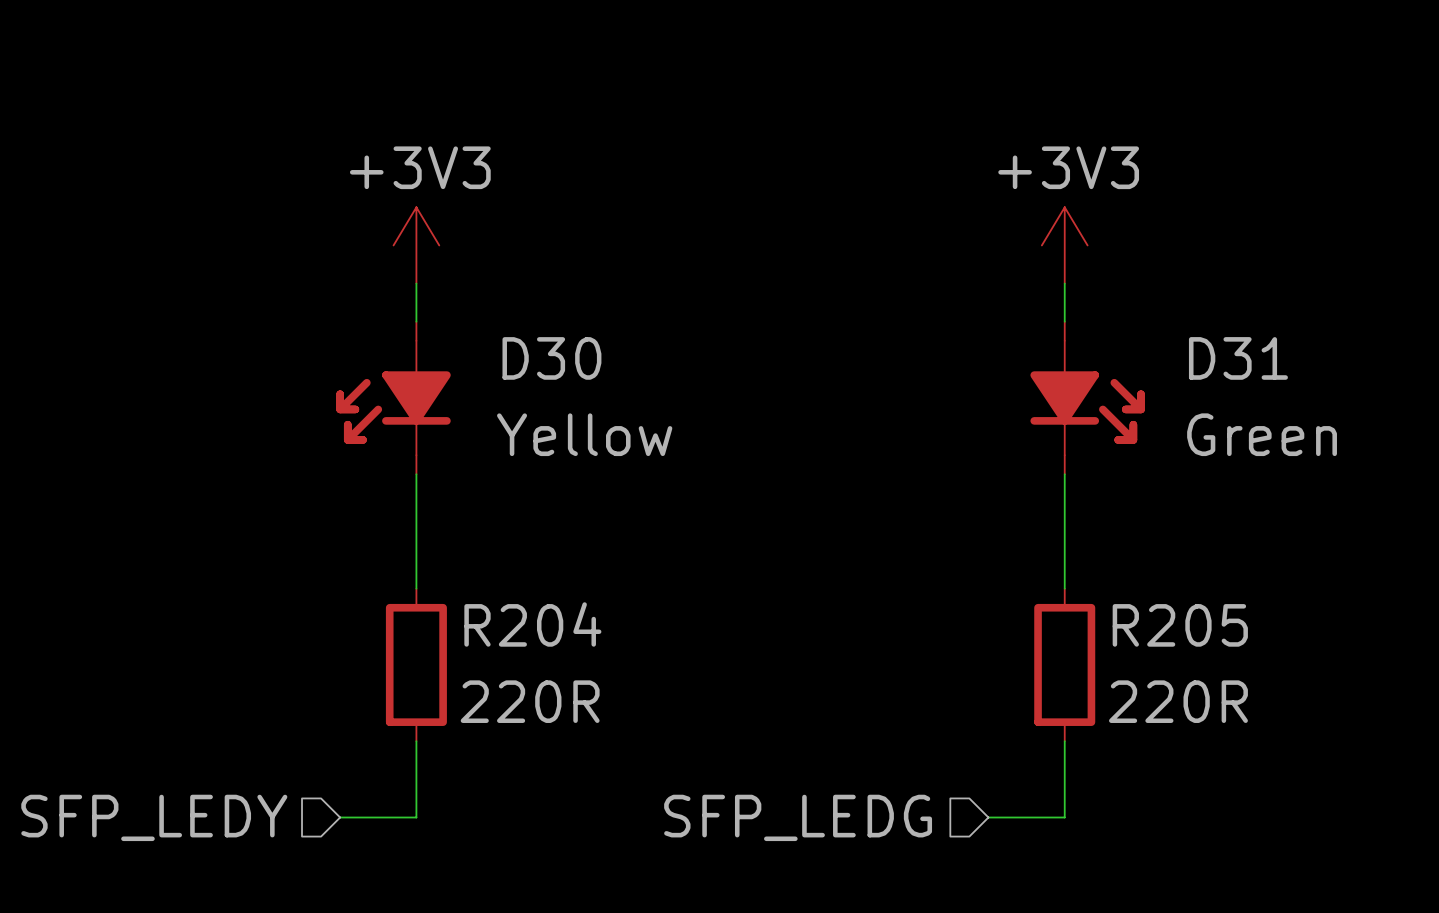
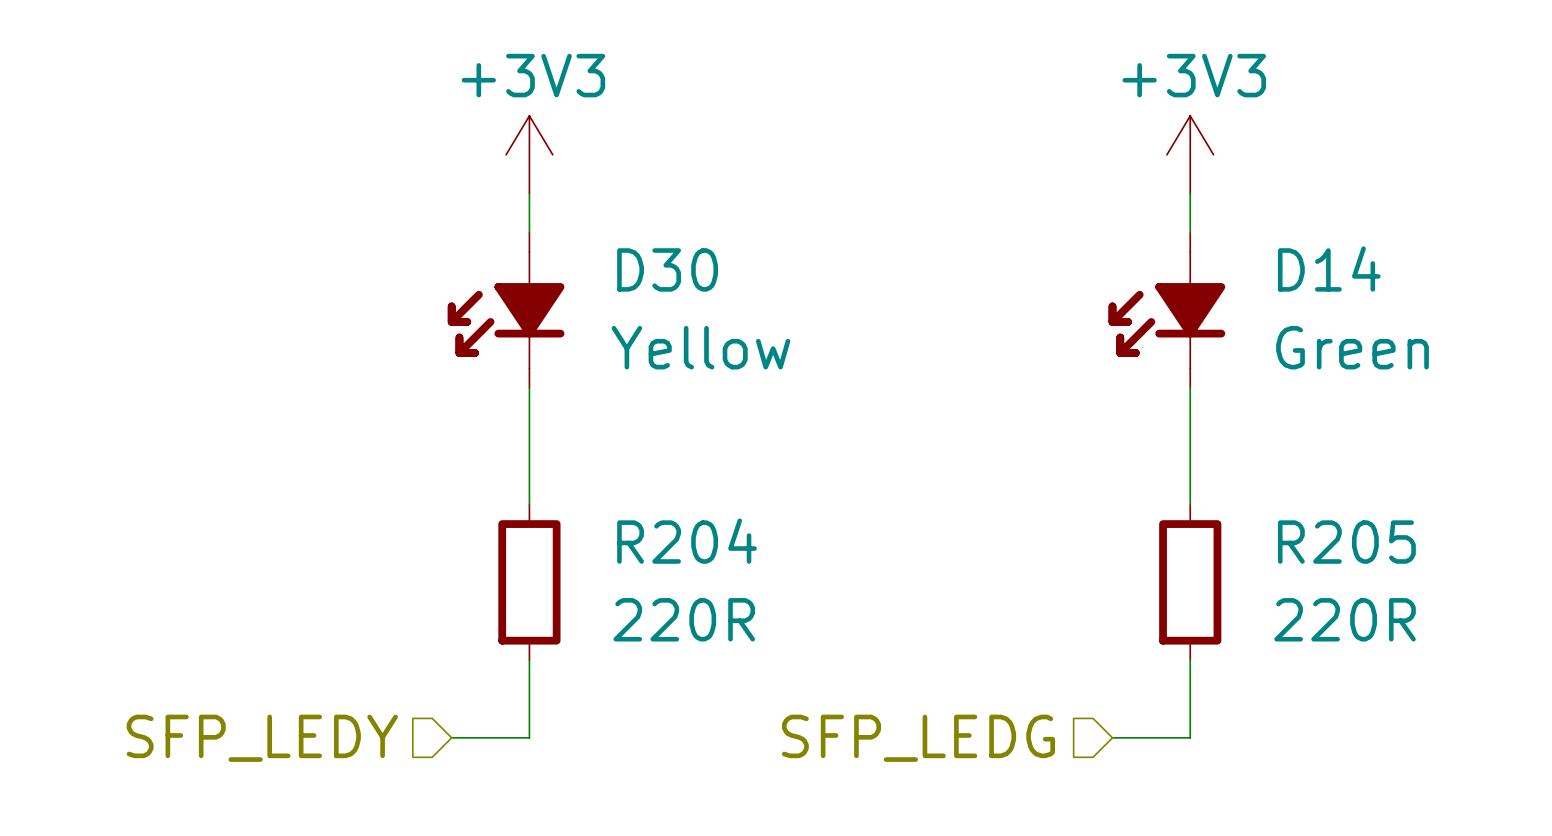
D14: none -> (1166, 310)
D31: (1087, 398) -> none
R204 name position: R204 (532, 624) -> R204 (687, 541)
R205 name position: R205 (1180, 625) -> R205 (1346, 542)
R204 text position: 220R (530, 701) -> 220R (684, 619)
R205 text position: 220R (1178, 701) -> 220R (1345, 619)

